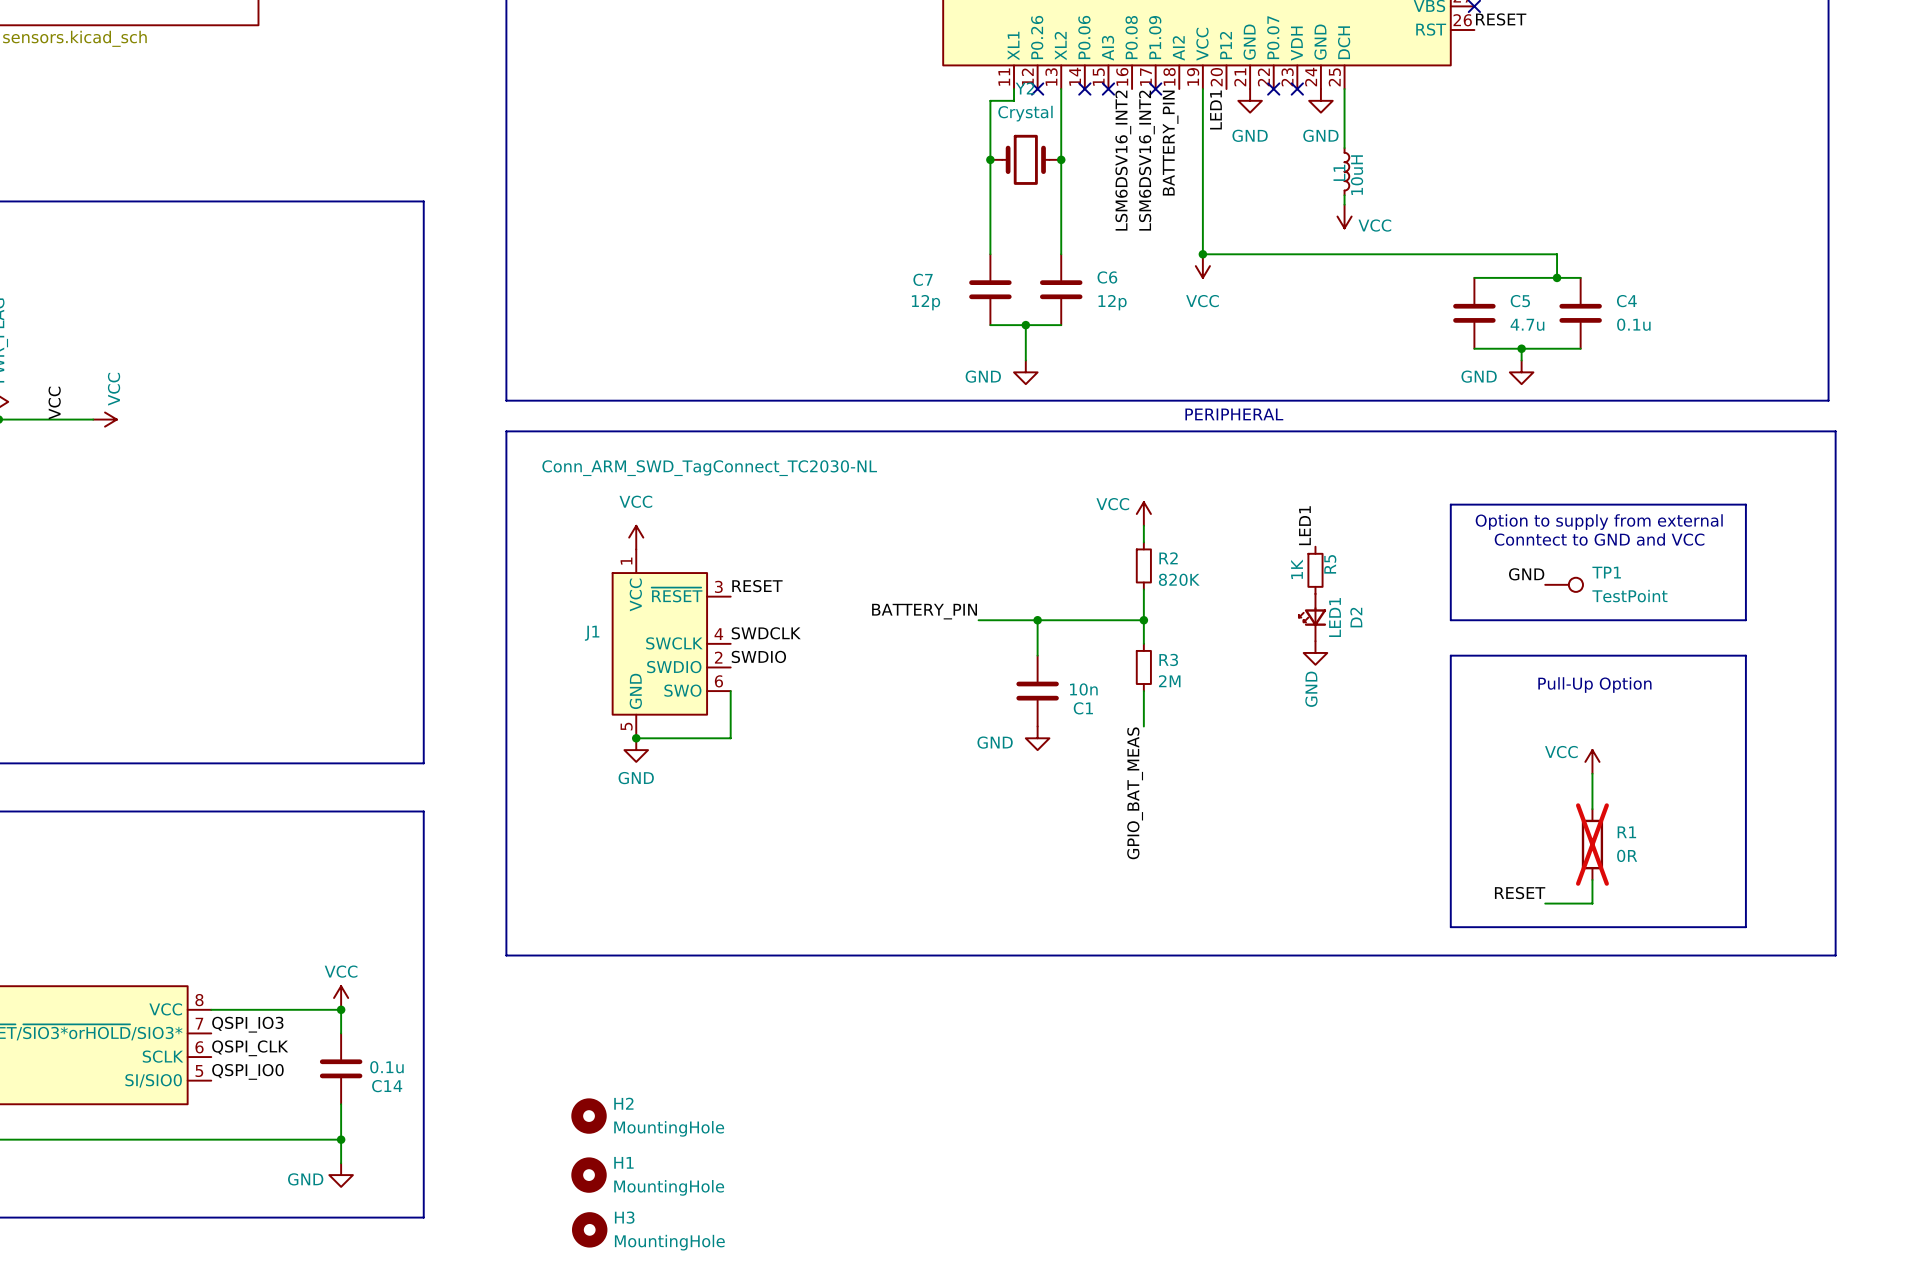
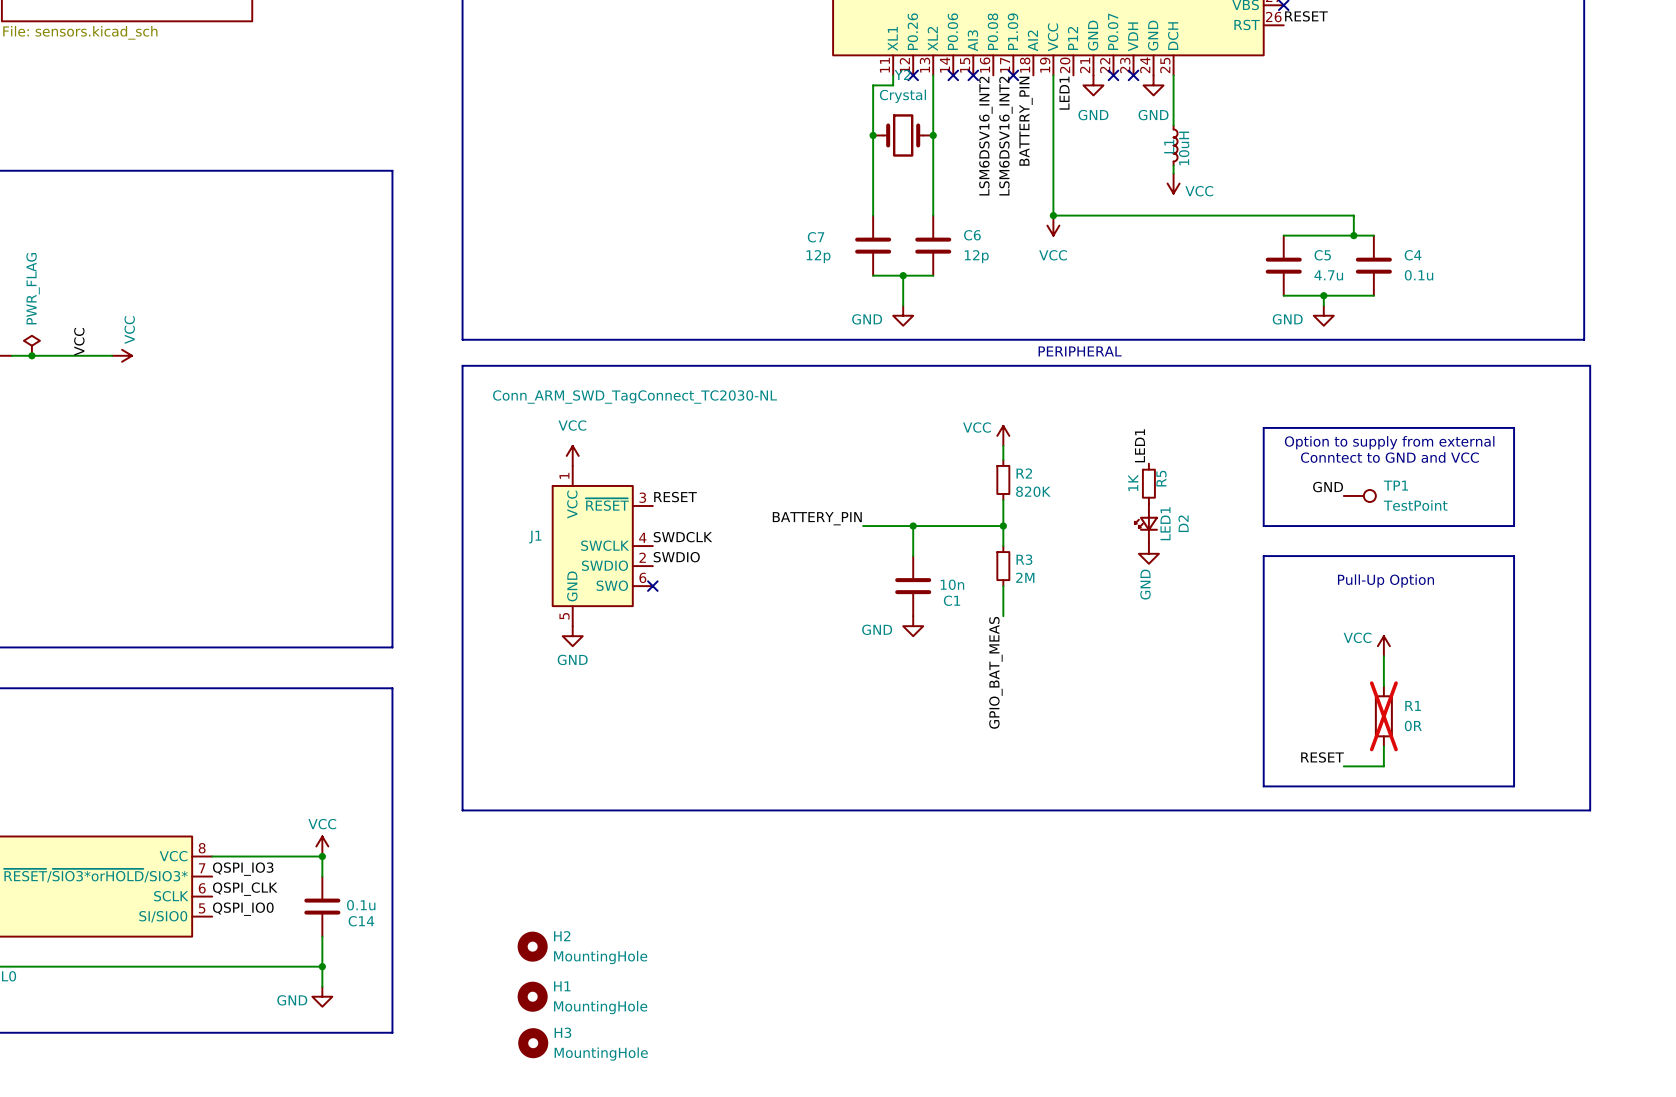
wire: (730, 691) (730, 738) (636, 738) -> none
no-connect mark: none -> (652, 586)
junction: (636, 738) -> none

